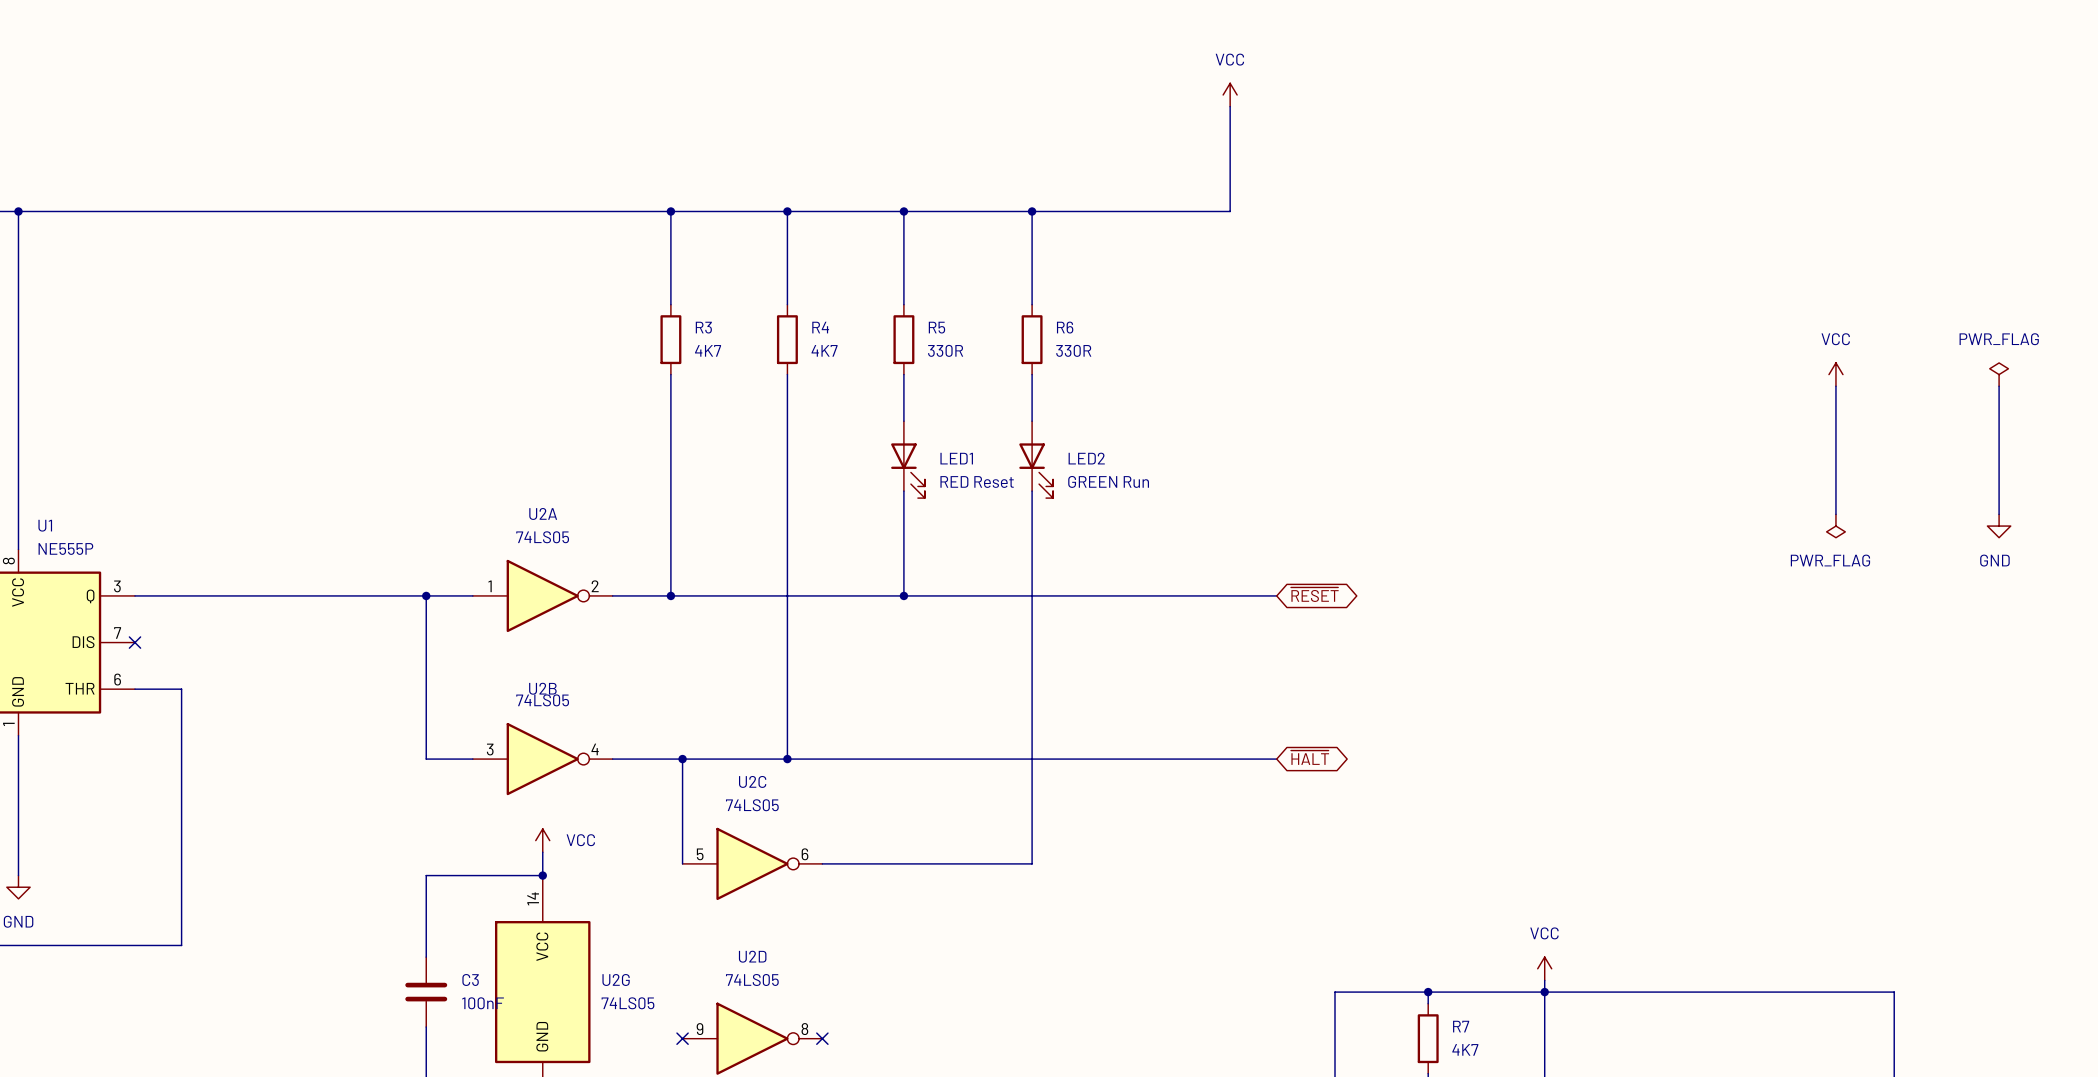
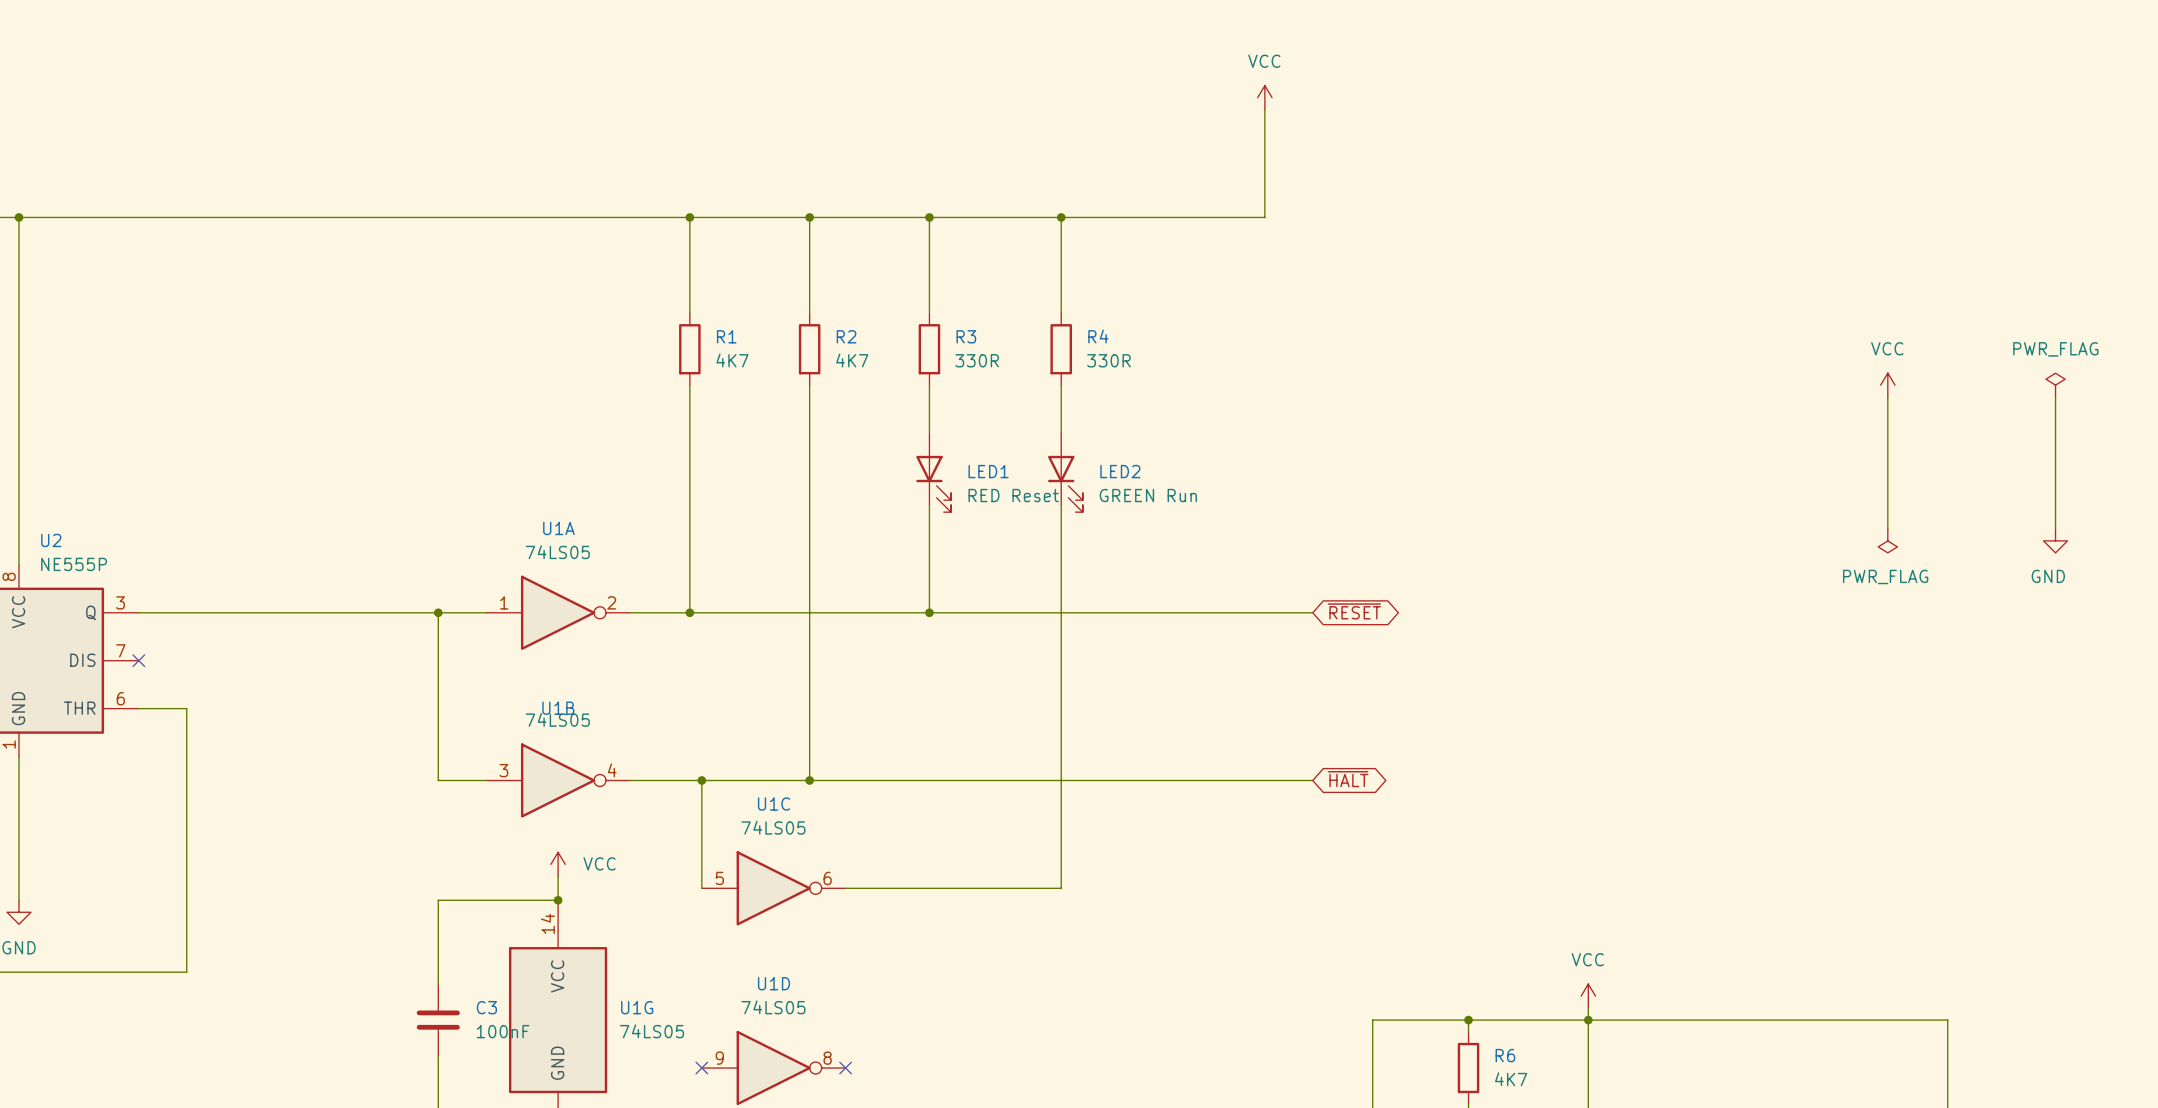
R3 name: R3 (703, 327) -> R1 (726, 336)
R4 name: R4 (820, 327) -> R2 (846, 336)
R5 name: R5 (936, 327) -> R3 (966, 336)
R6 name: R6 (1065, 327) -> R4 (1098, 336)
U2A name: U2A (543, 513) -> U1A (558, 528)
U1 name: U1 (45, 525) -> U2 (51, 540)
U2B name: U2B (542, 688) -> U1B (558, 708)
U2C name: U2C (752, 781) -> U1C (774, 804)
U2D name: U2D (752, 956) -> U1D (774, 983)
U2G name: U2G (616, 979) -> U1G (637, 1007)
R7 name: R7 (1461, 1026) -> R6 (1505, 1055)

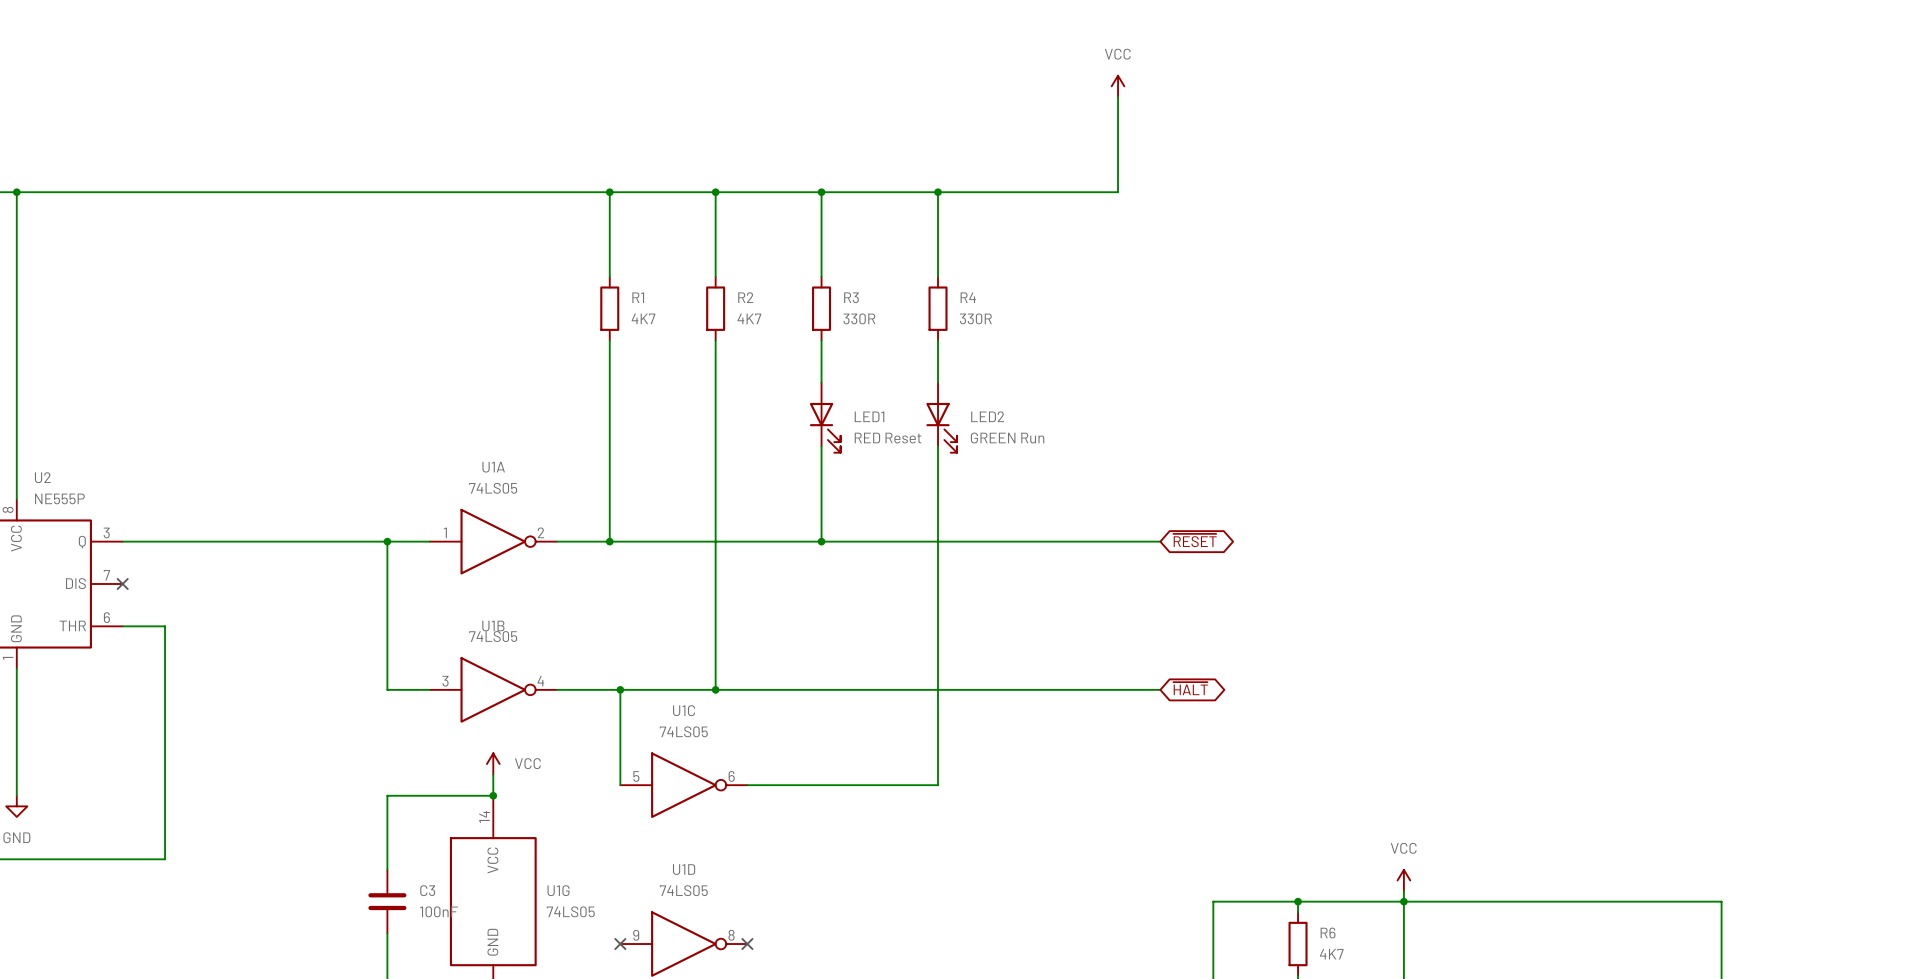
power symbol: VCC (1887, 385) -> none
power symbol: PWR_FLAG (2055, 385) -> none
wire: (1887, 397) (1887, 528) -> none
wire: (2055, 397) (2055, 528) -> none
power symbol: PWR_FLAG (1887, 540) -> none
power symbol: GND (2055, 540) -> none

